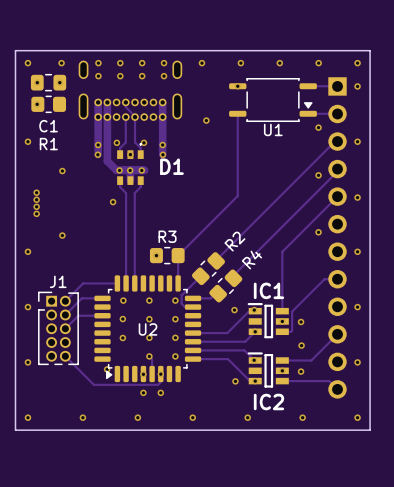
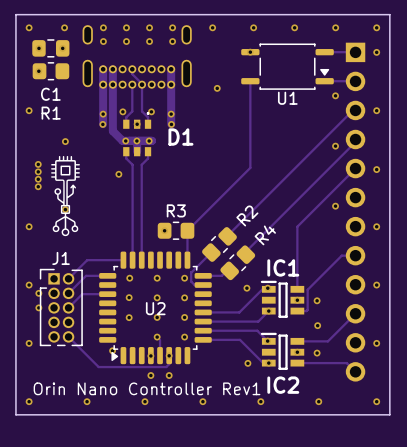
drawing: none -> [51, 155, 80, 237]
via: none -> (38, 293)
via: none -> (38, 307)
text: none -> Orin Nano Controller Rev1 (147, 388)

